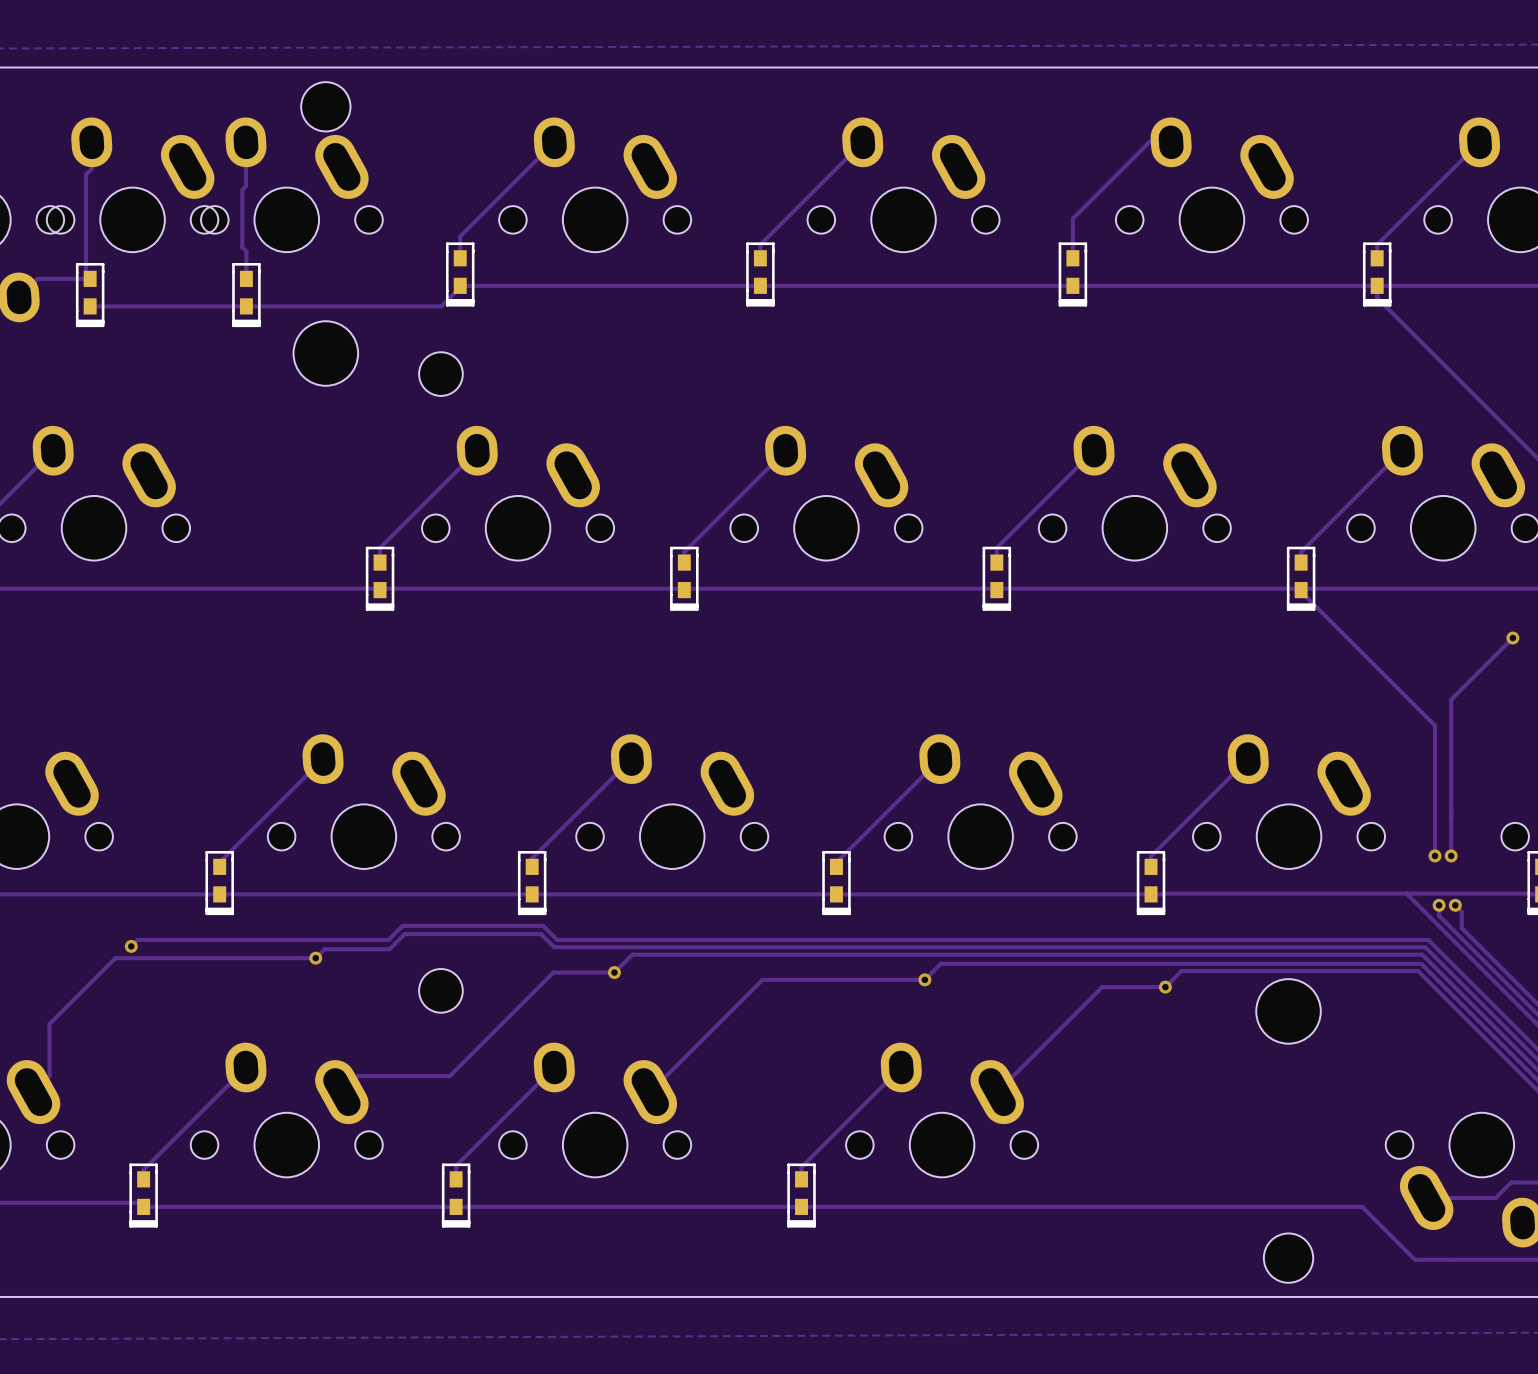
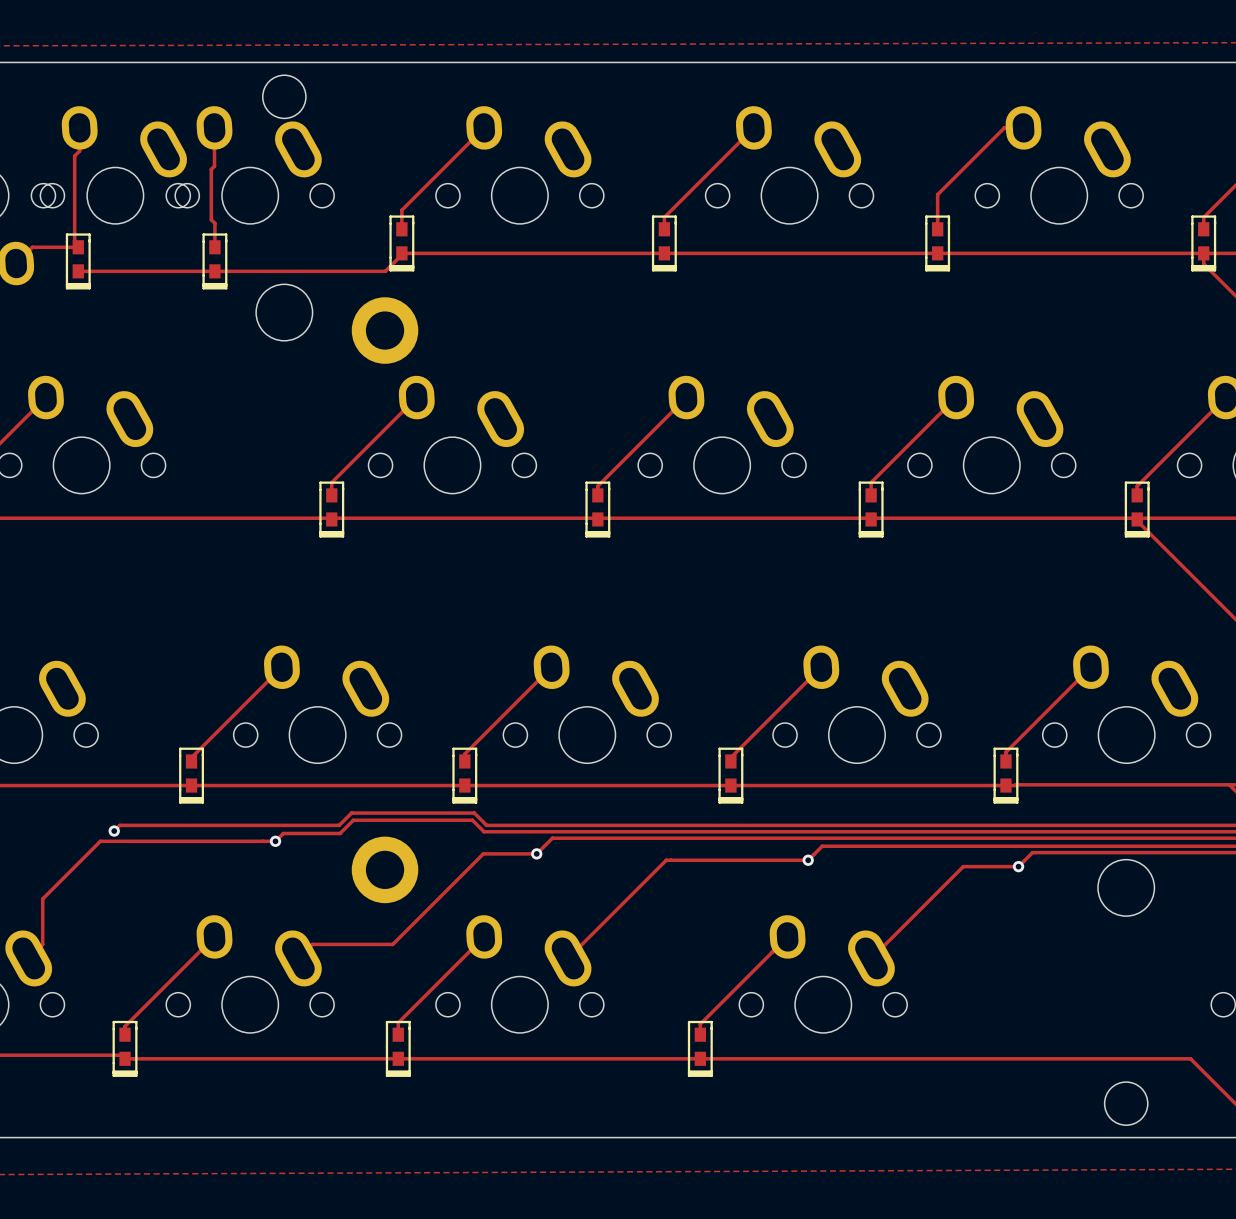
part footprint: [419, 352, 463, 396] -> [351, 297, 419, 364]
part footprint: [419, 969, 463, 1013] -> [351, 836, 419, 904]

